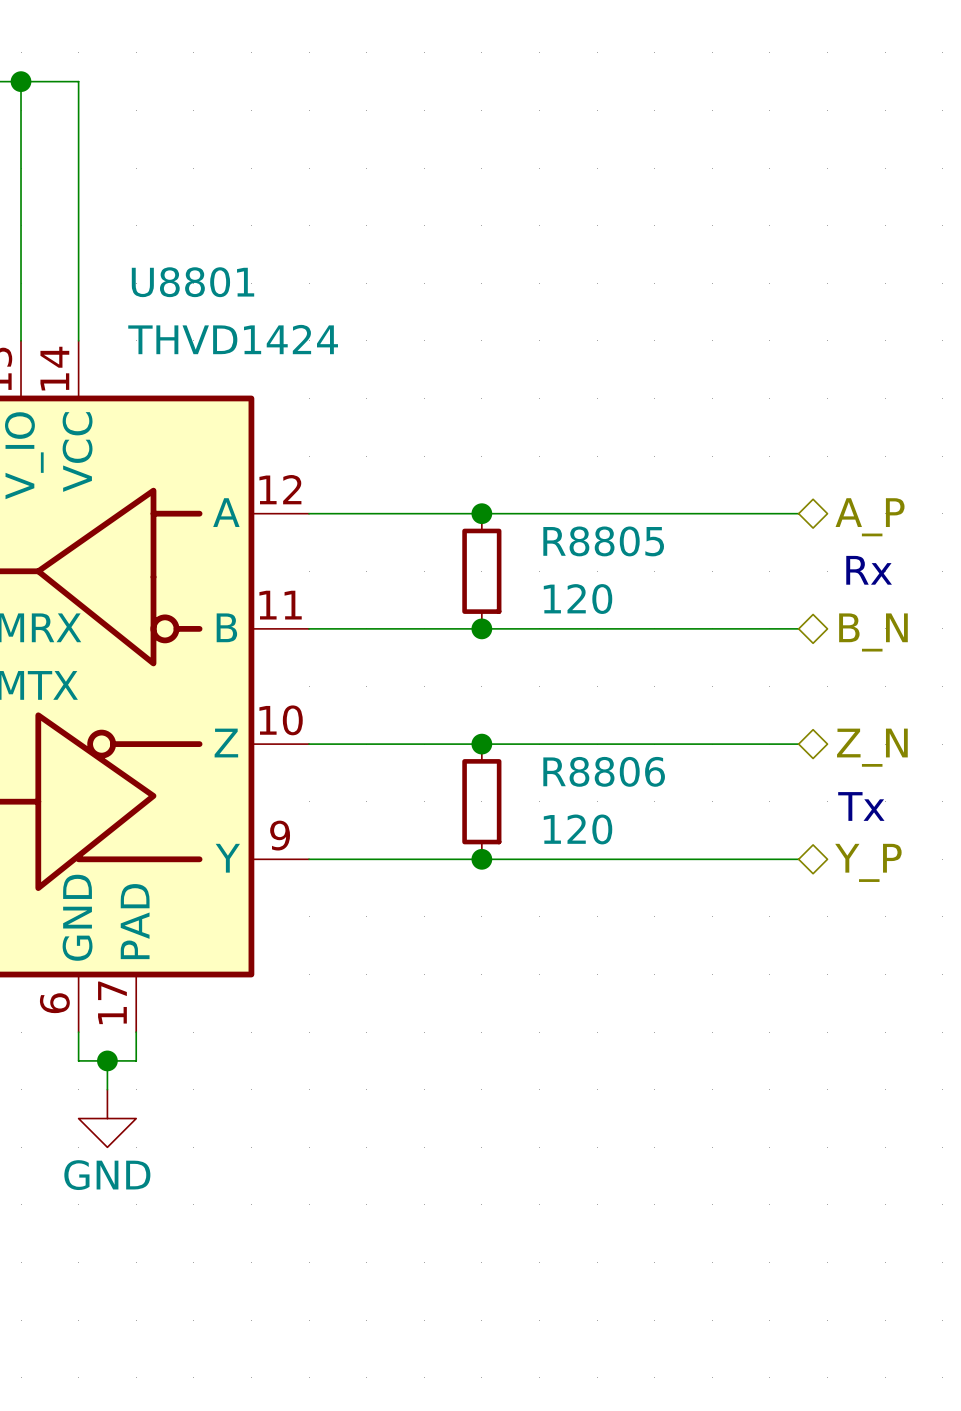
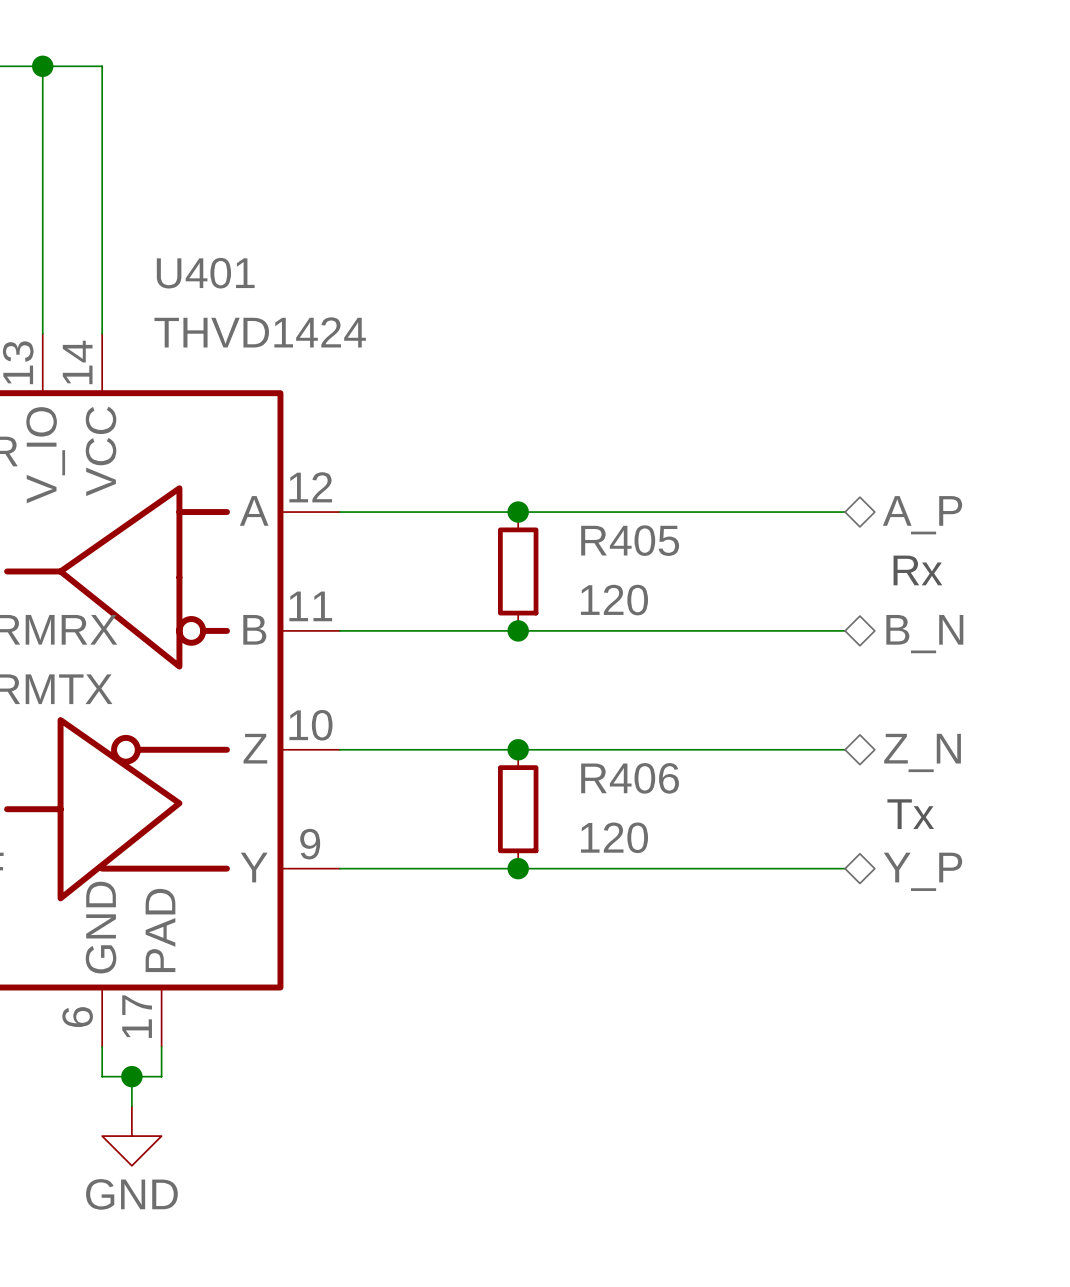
U8801 name: U8801 (192, 282) -> U401 (205, 273)
R8805 name: R8805 (603, 541) -> R405 (630, 540)
R8806 name: R8806 (604, 771) -> R406 (630, 778)

